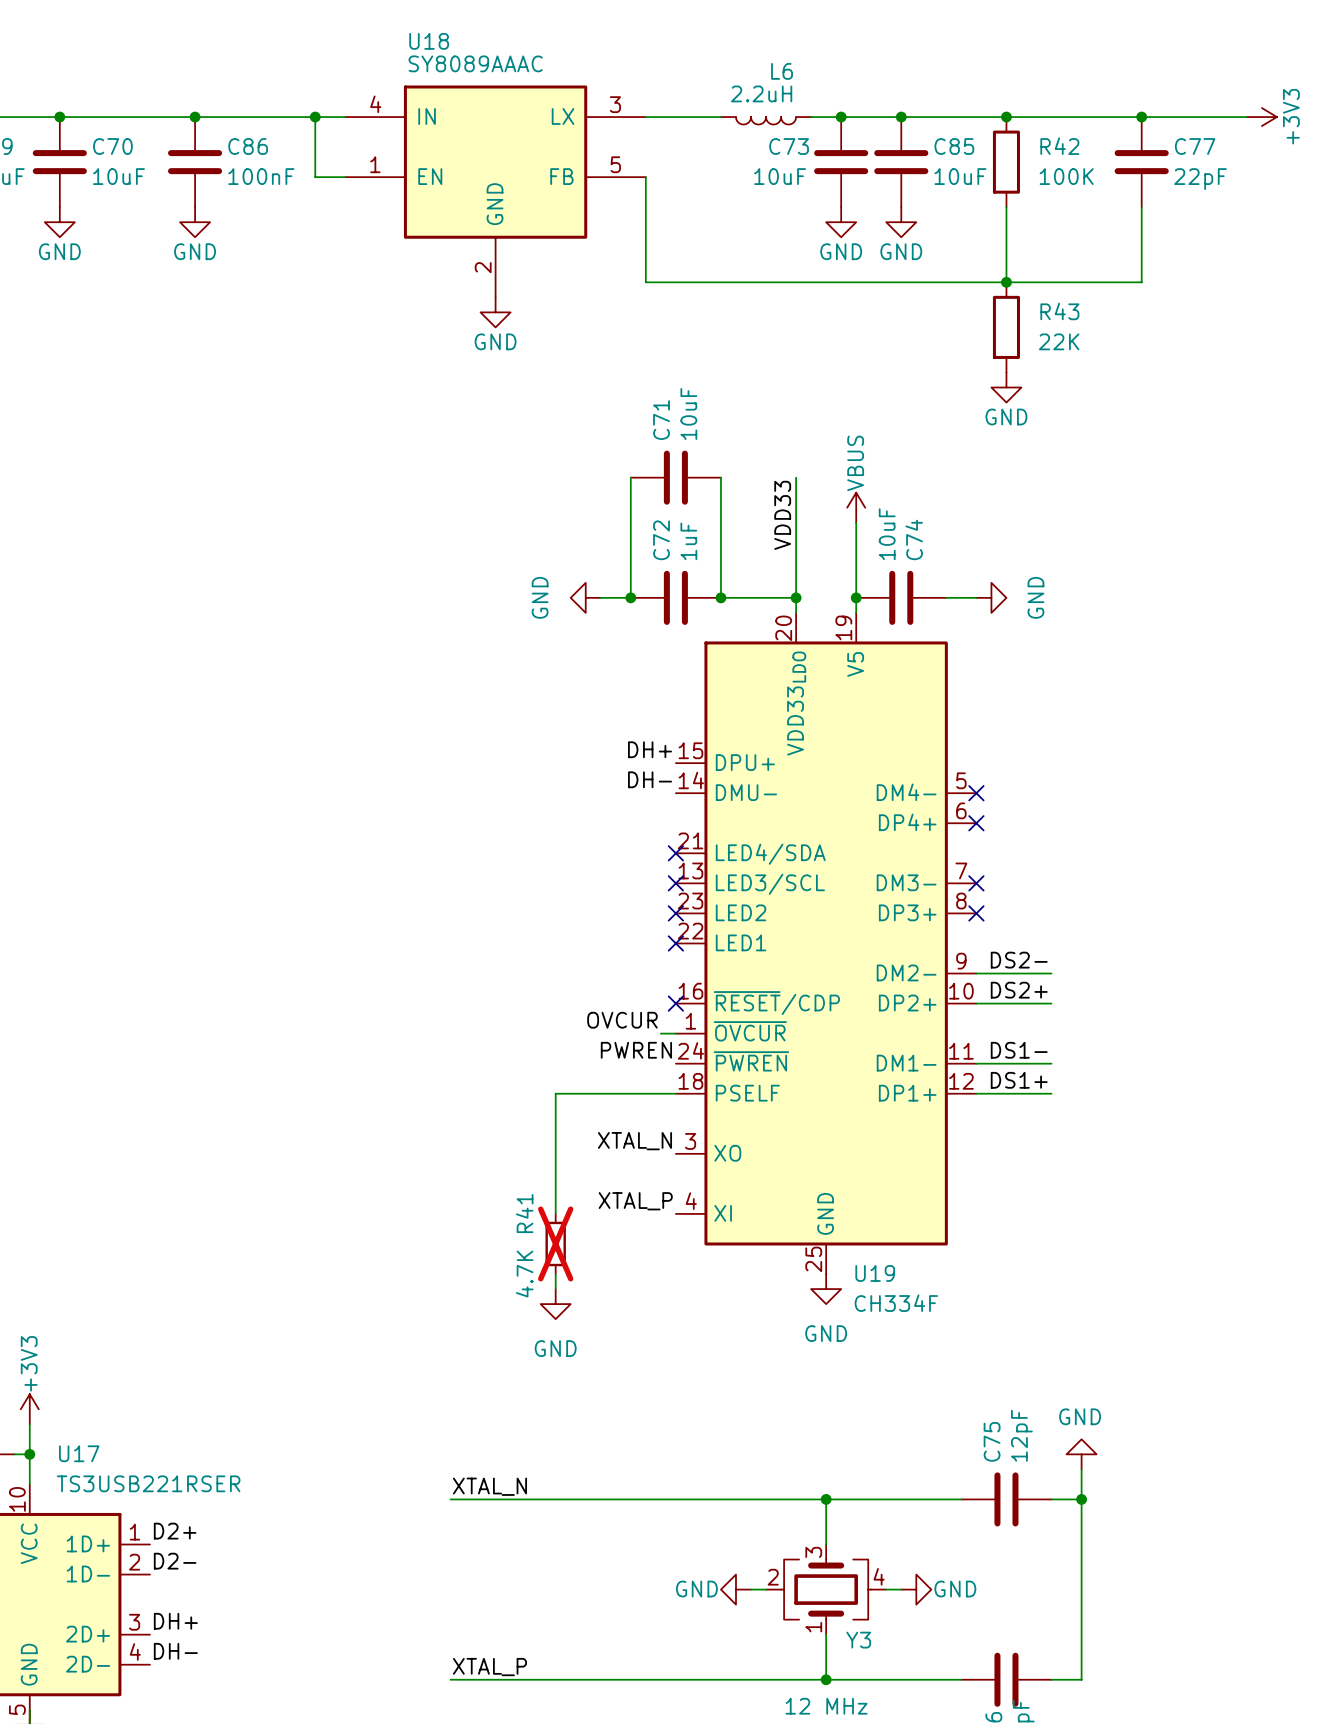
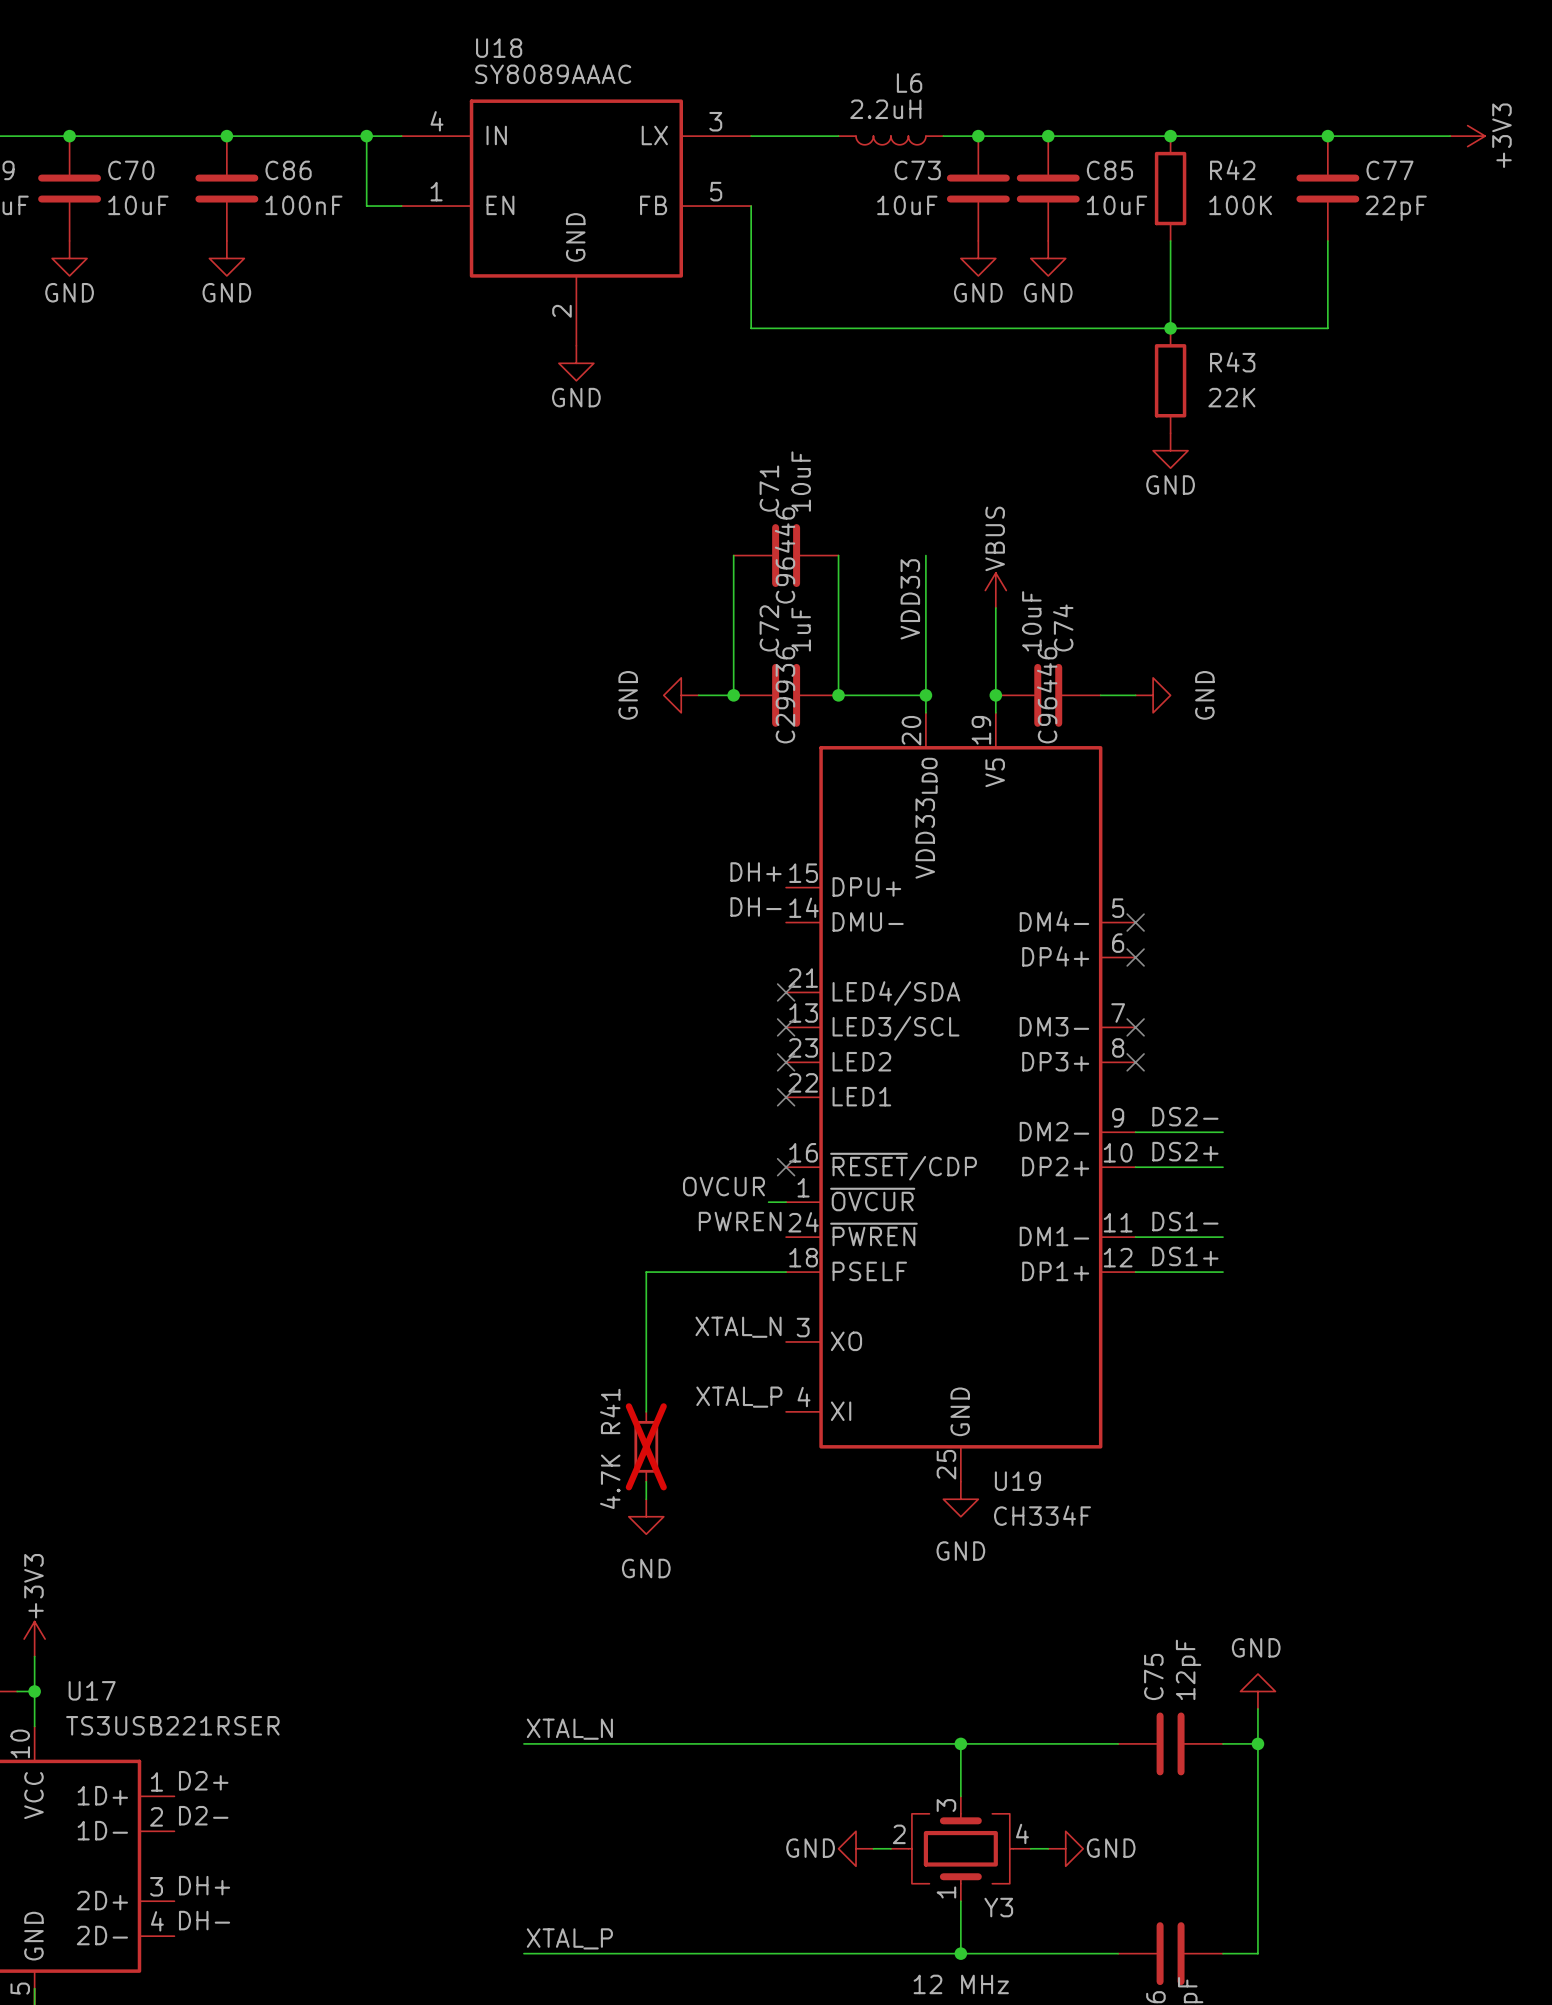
C71 text: none -> C96446 (785, 555)
C72 text: none -> C29936 (785, 695)
C74 text: none -> C96446 (1047, 695)

